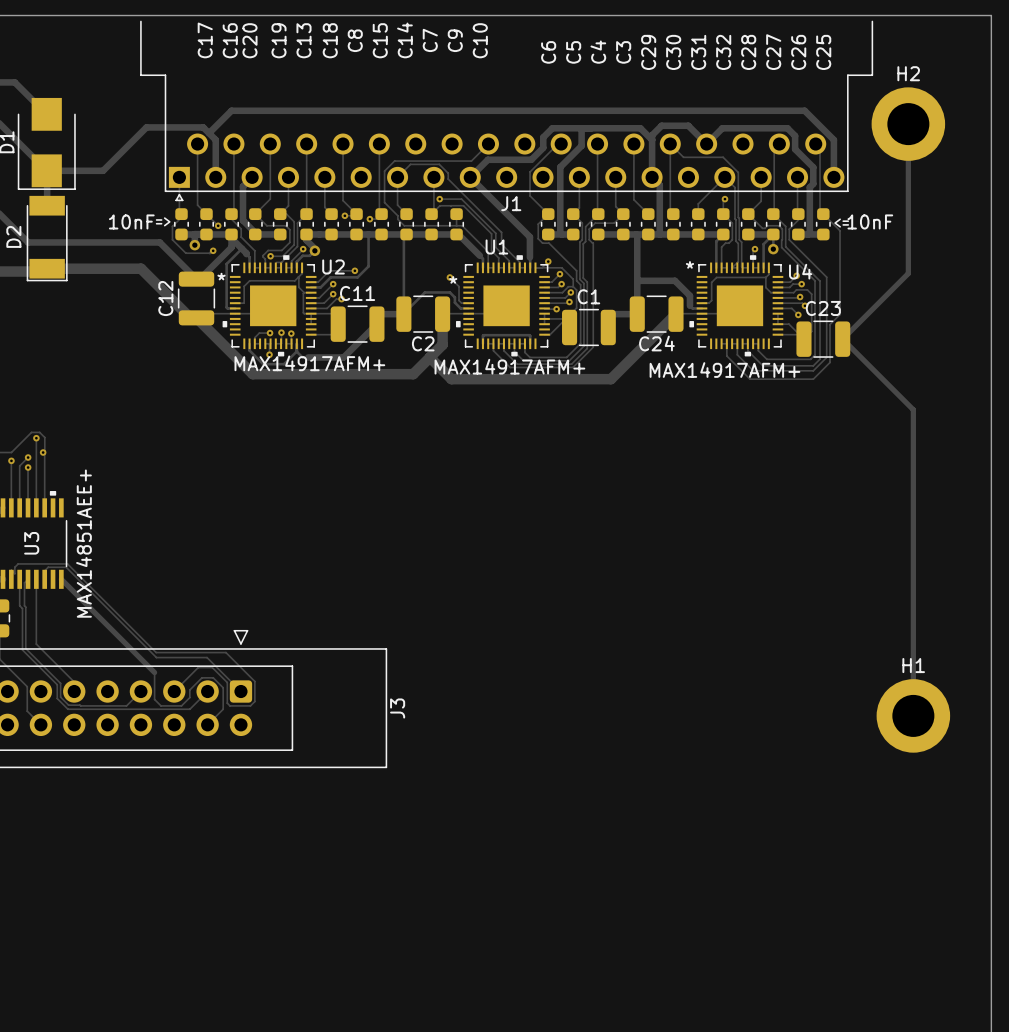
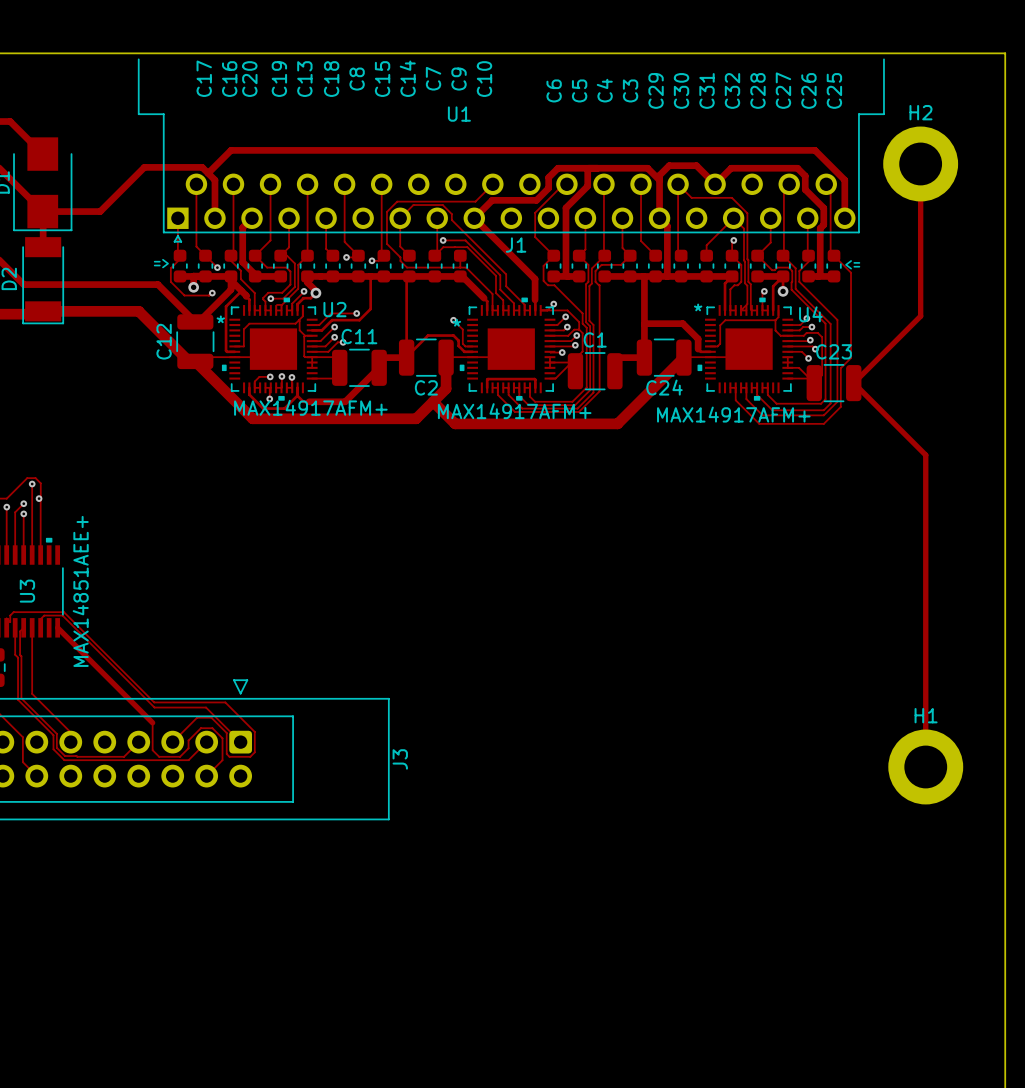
C17 value: 10nF (131, 221) -> none
C6 value: 10nF (870, 221) -> none
U1 name position: U1 (496, 246) -> U1 (459, 114)

